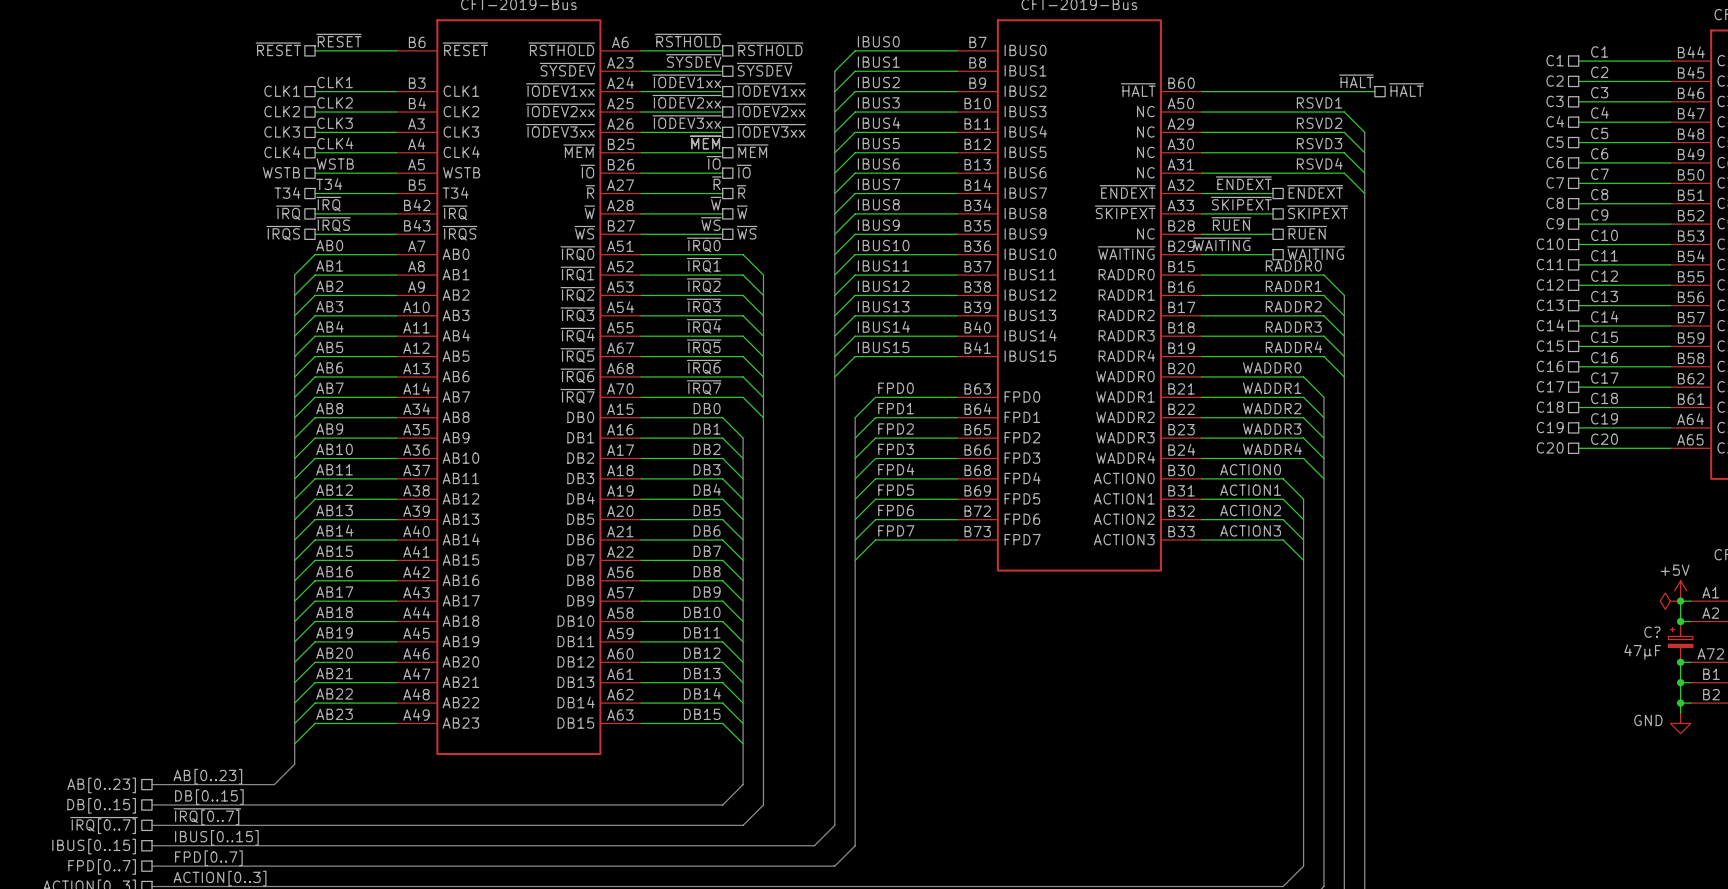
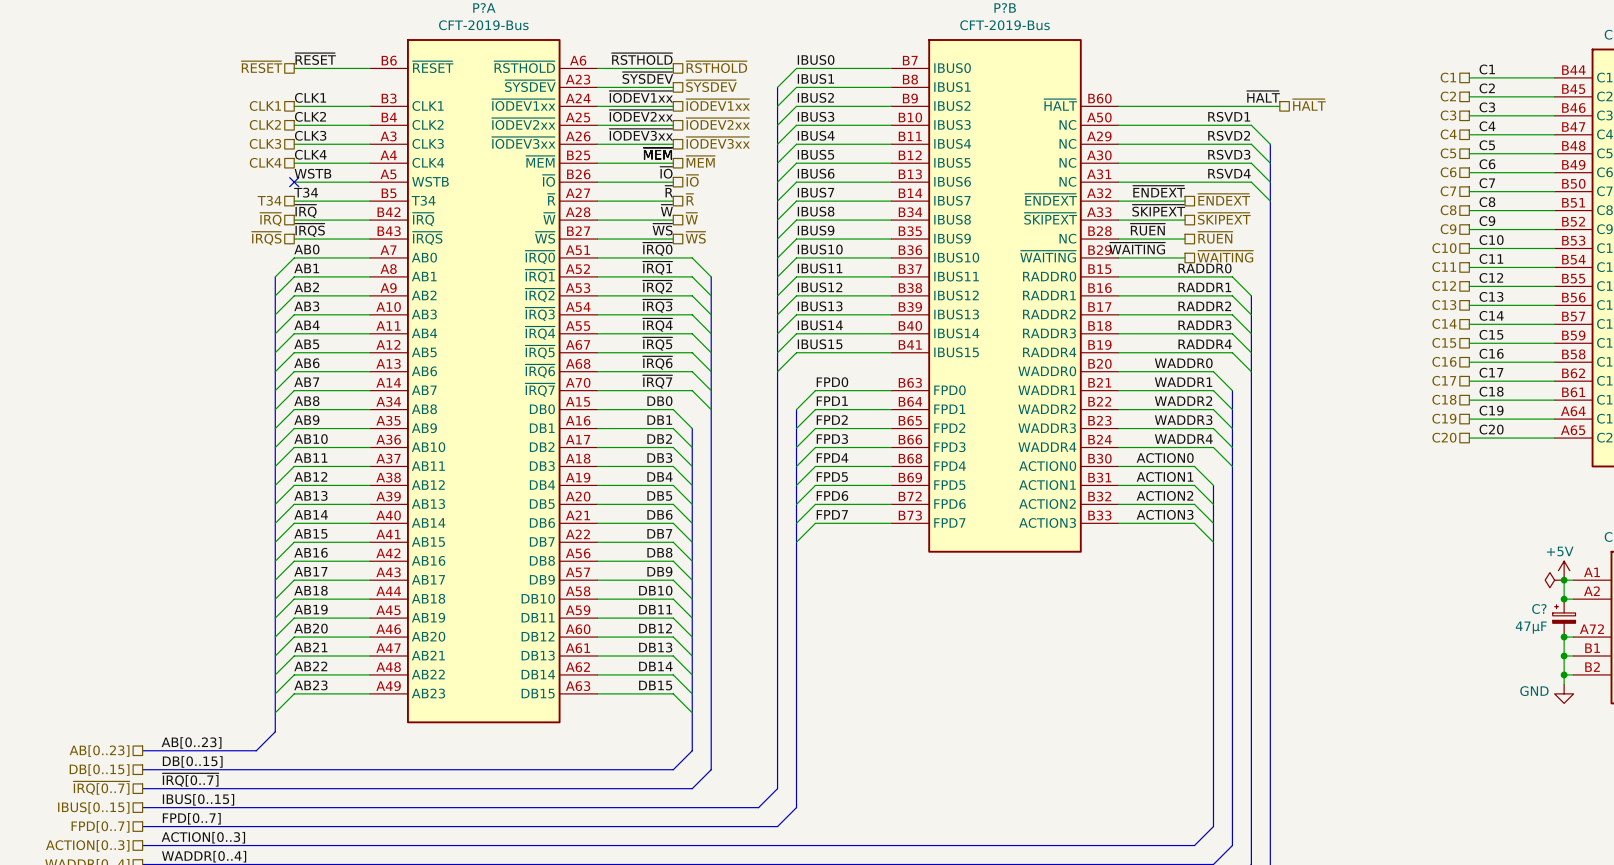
hierarchical label: WSTB (281, 172) -> none
no-connect mark: none -> (294, 182)

